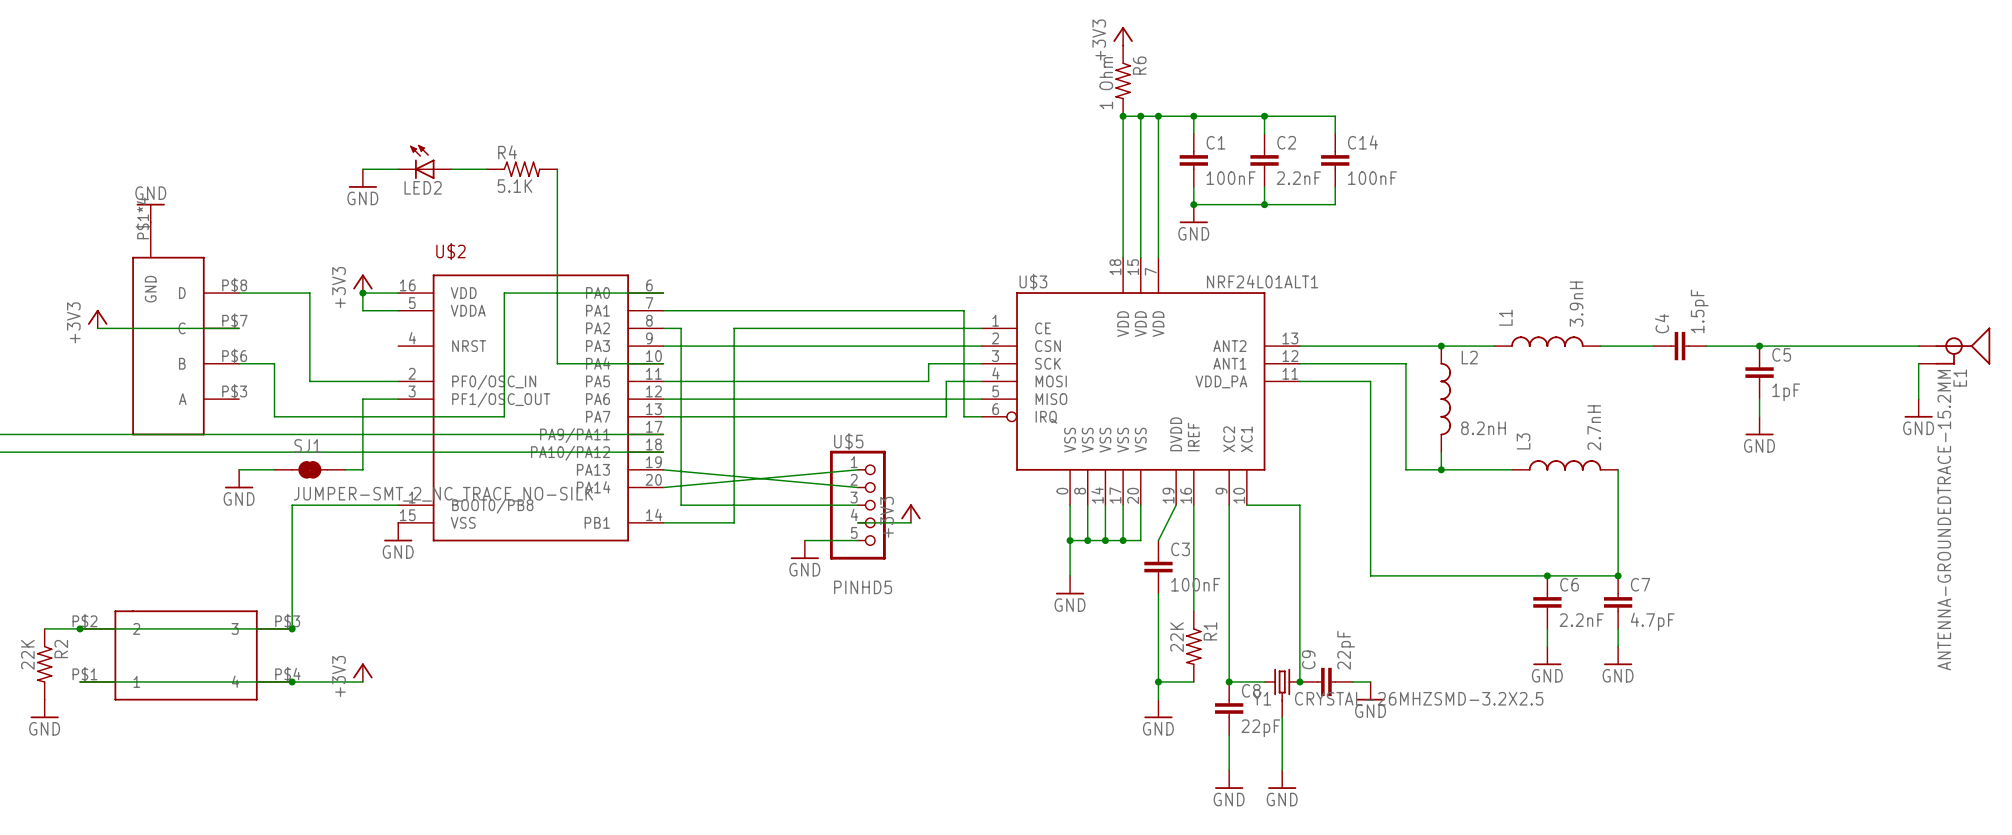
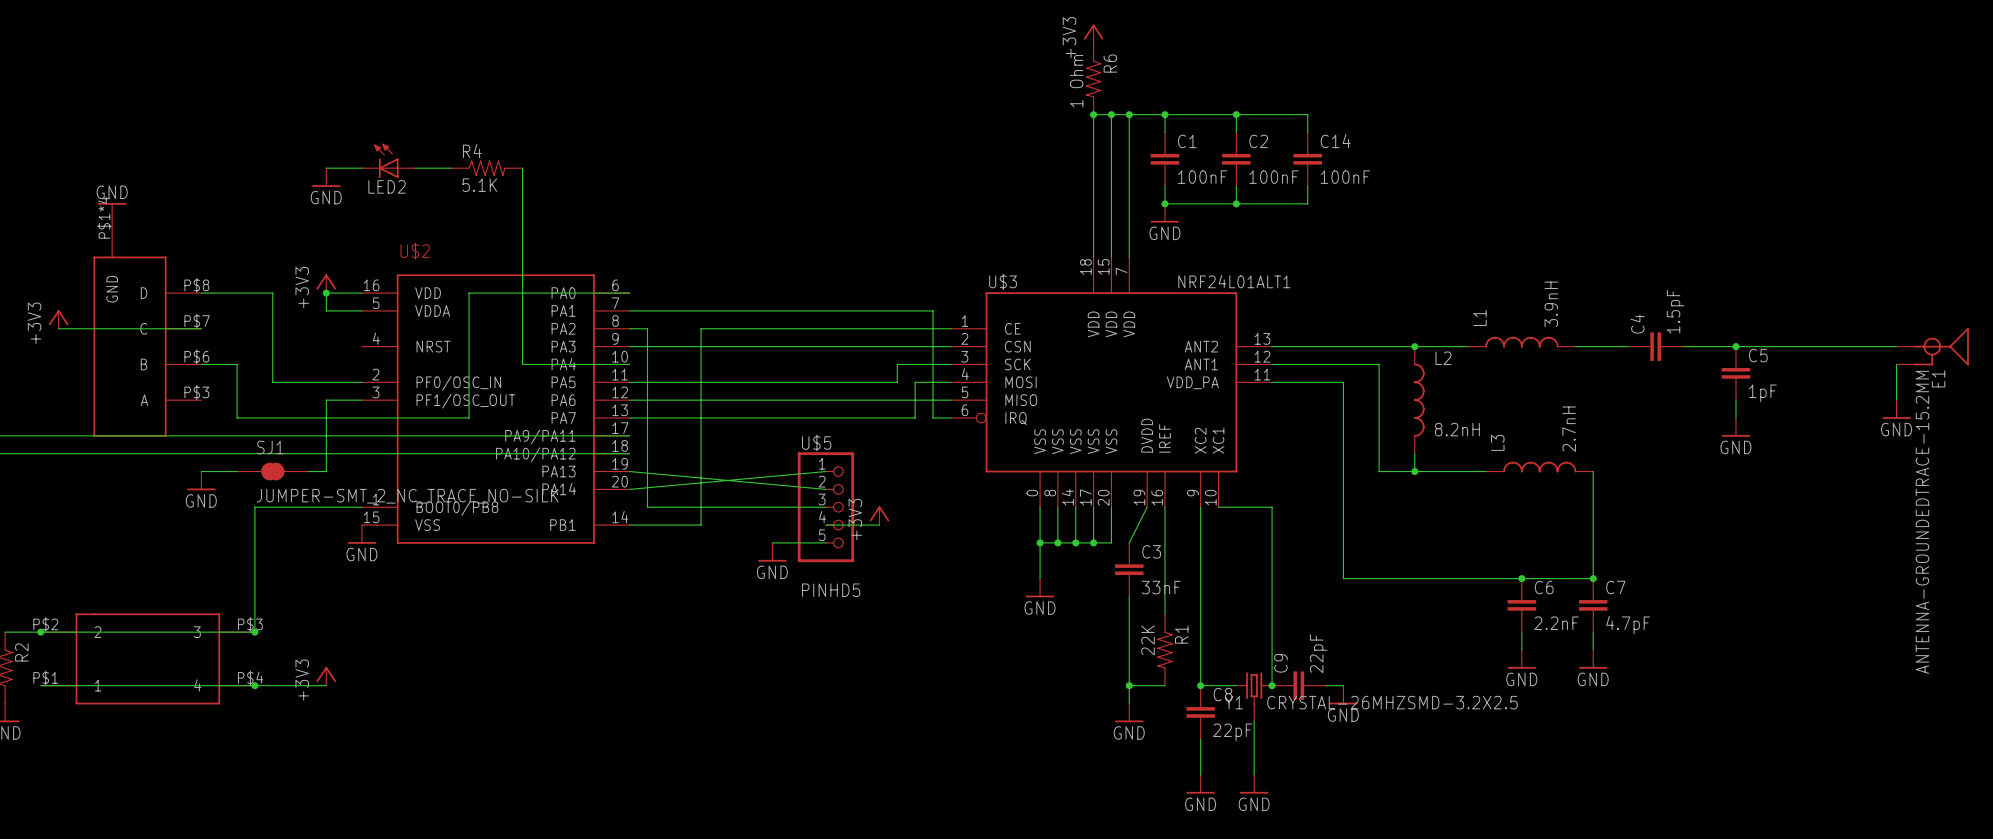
C2 value: 2.2nF (1298, 178) -> 100nF (1273, 177)
C3 value: 100nF (1195, 584) -> 33nF (1161, 587)

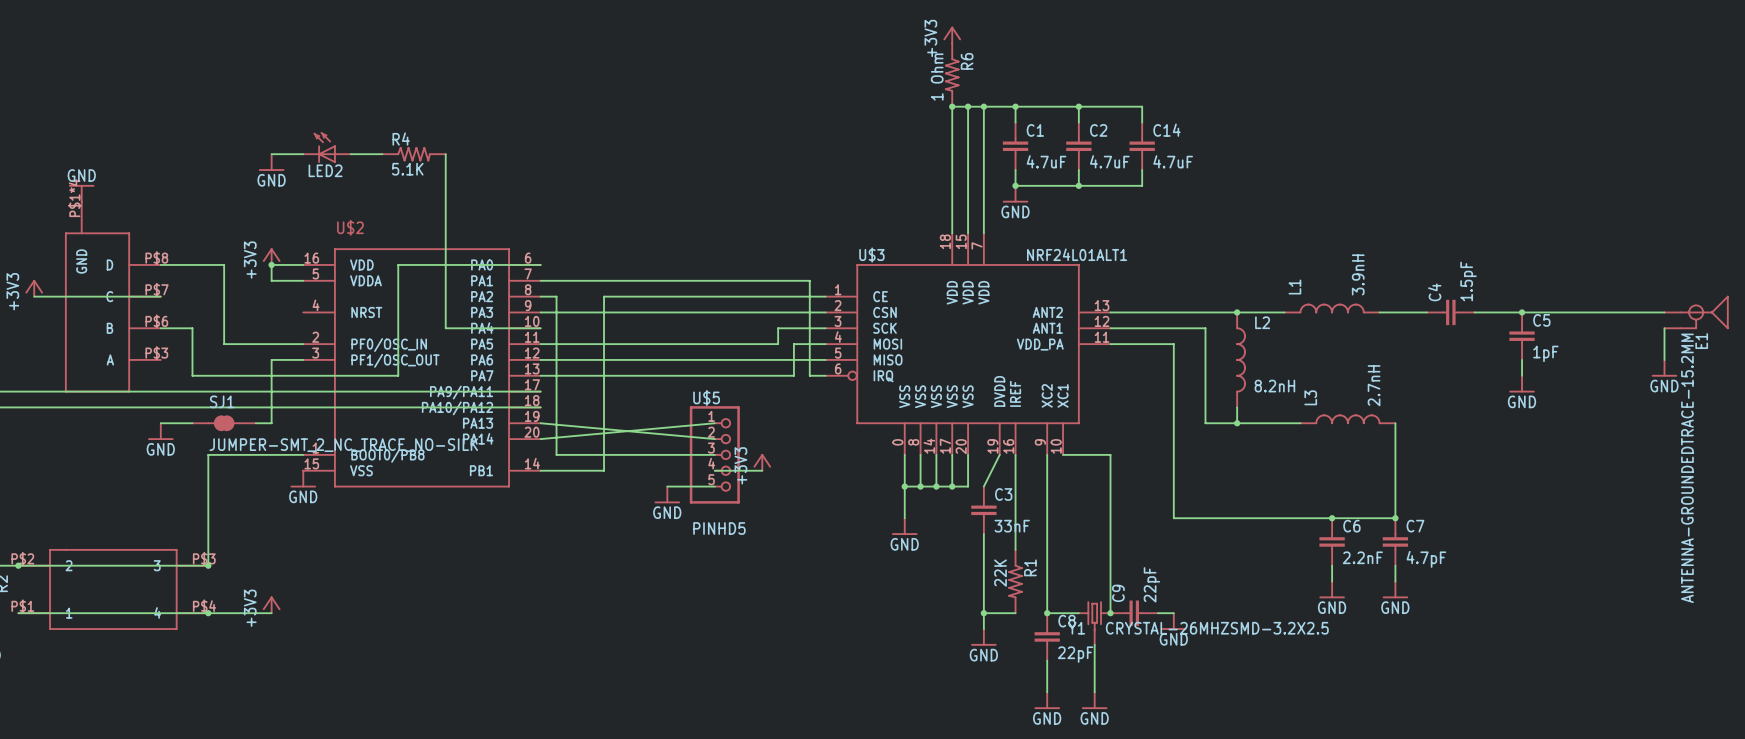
C1 value: 100nF (1202, 177) -> 4.7uF (1046, 161)
C2 value: 100nF (1273, 177) -> 4.7uF (1109, 161)
C14 value: 100nF (1345, 177) -> 4.7uF (1173, 161)

